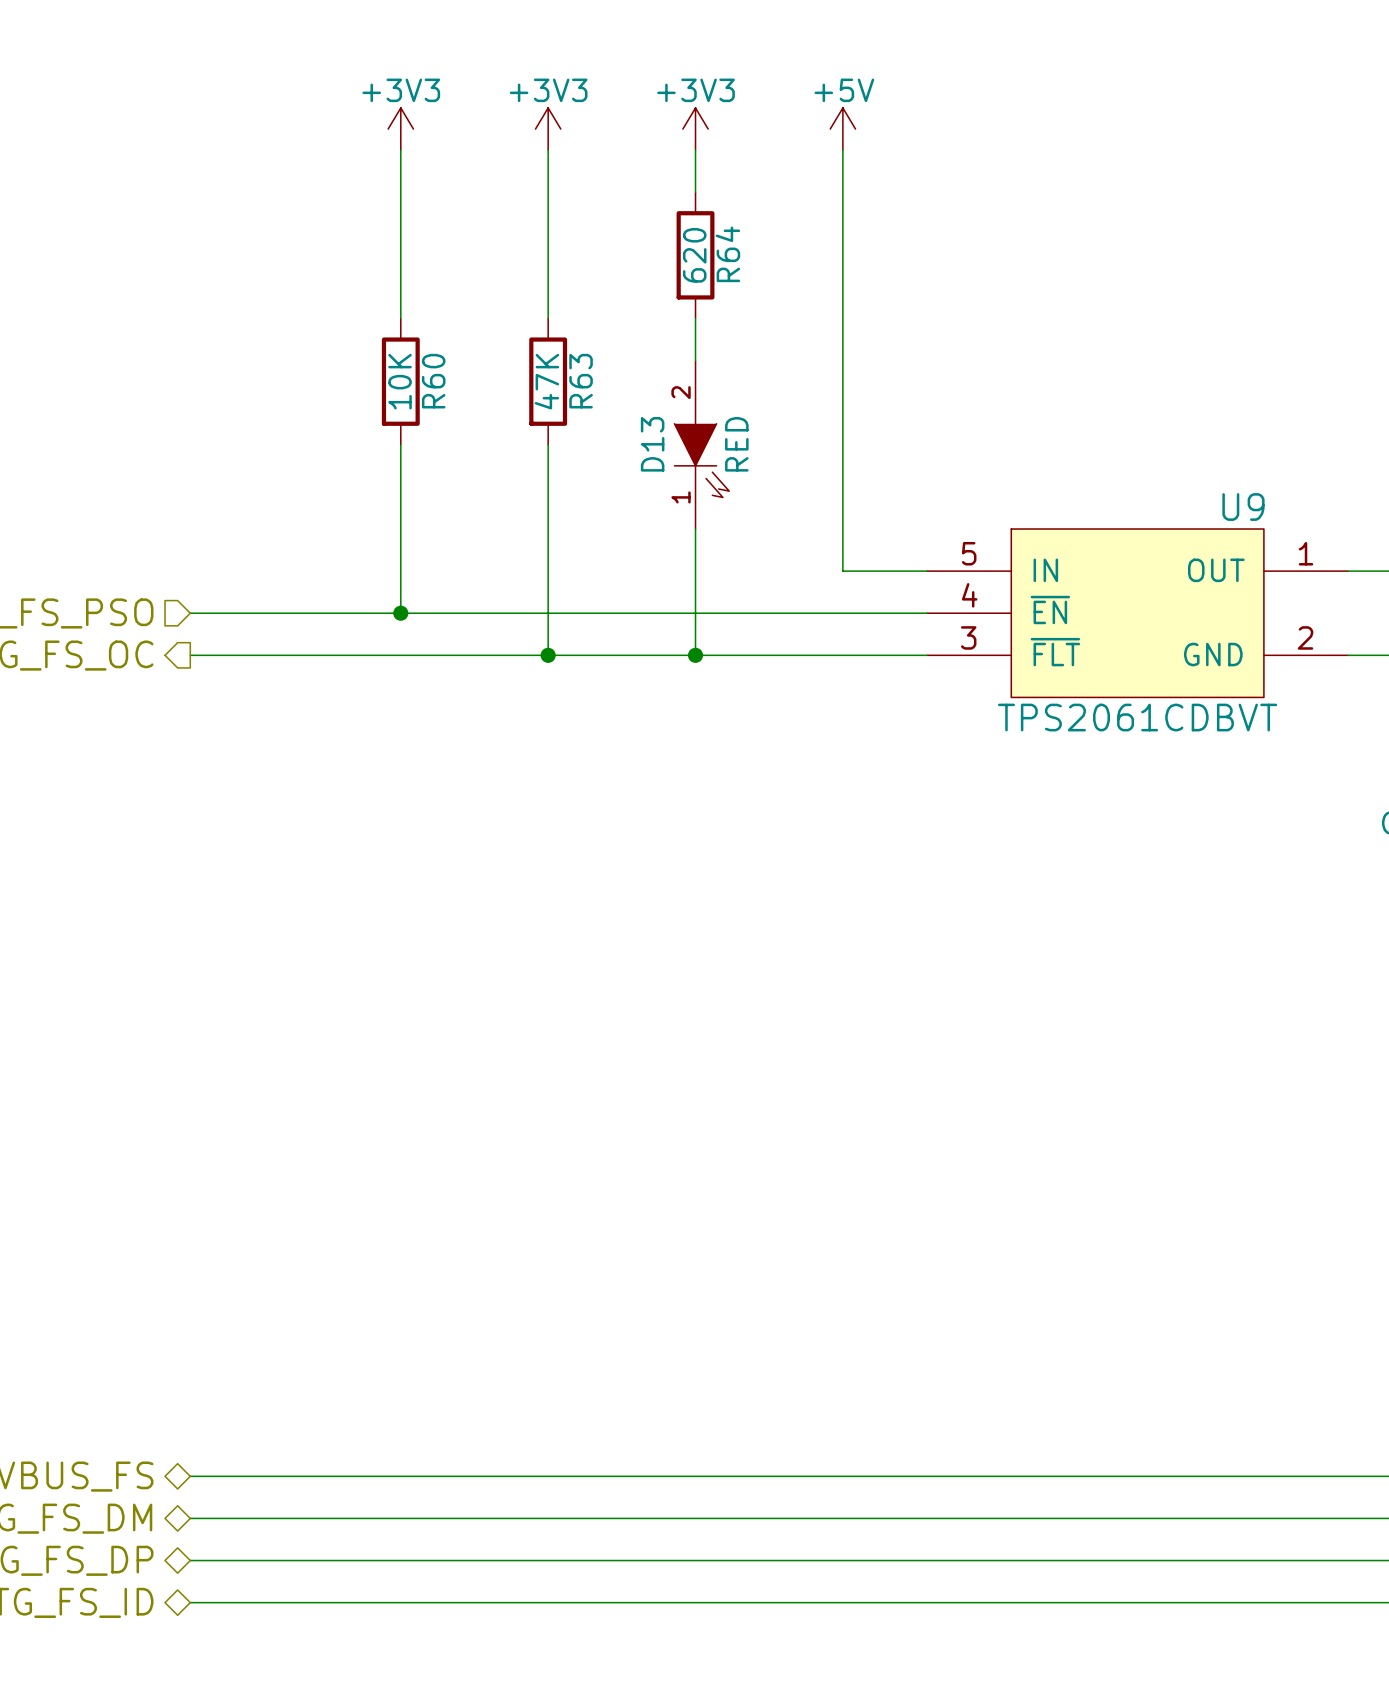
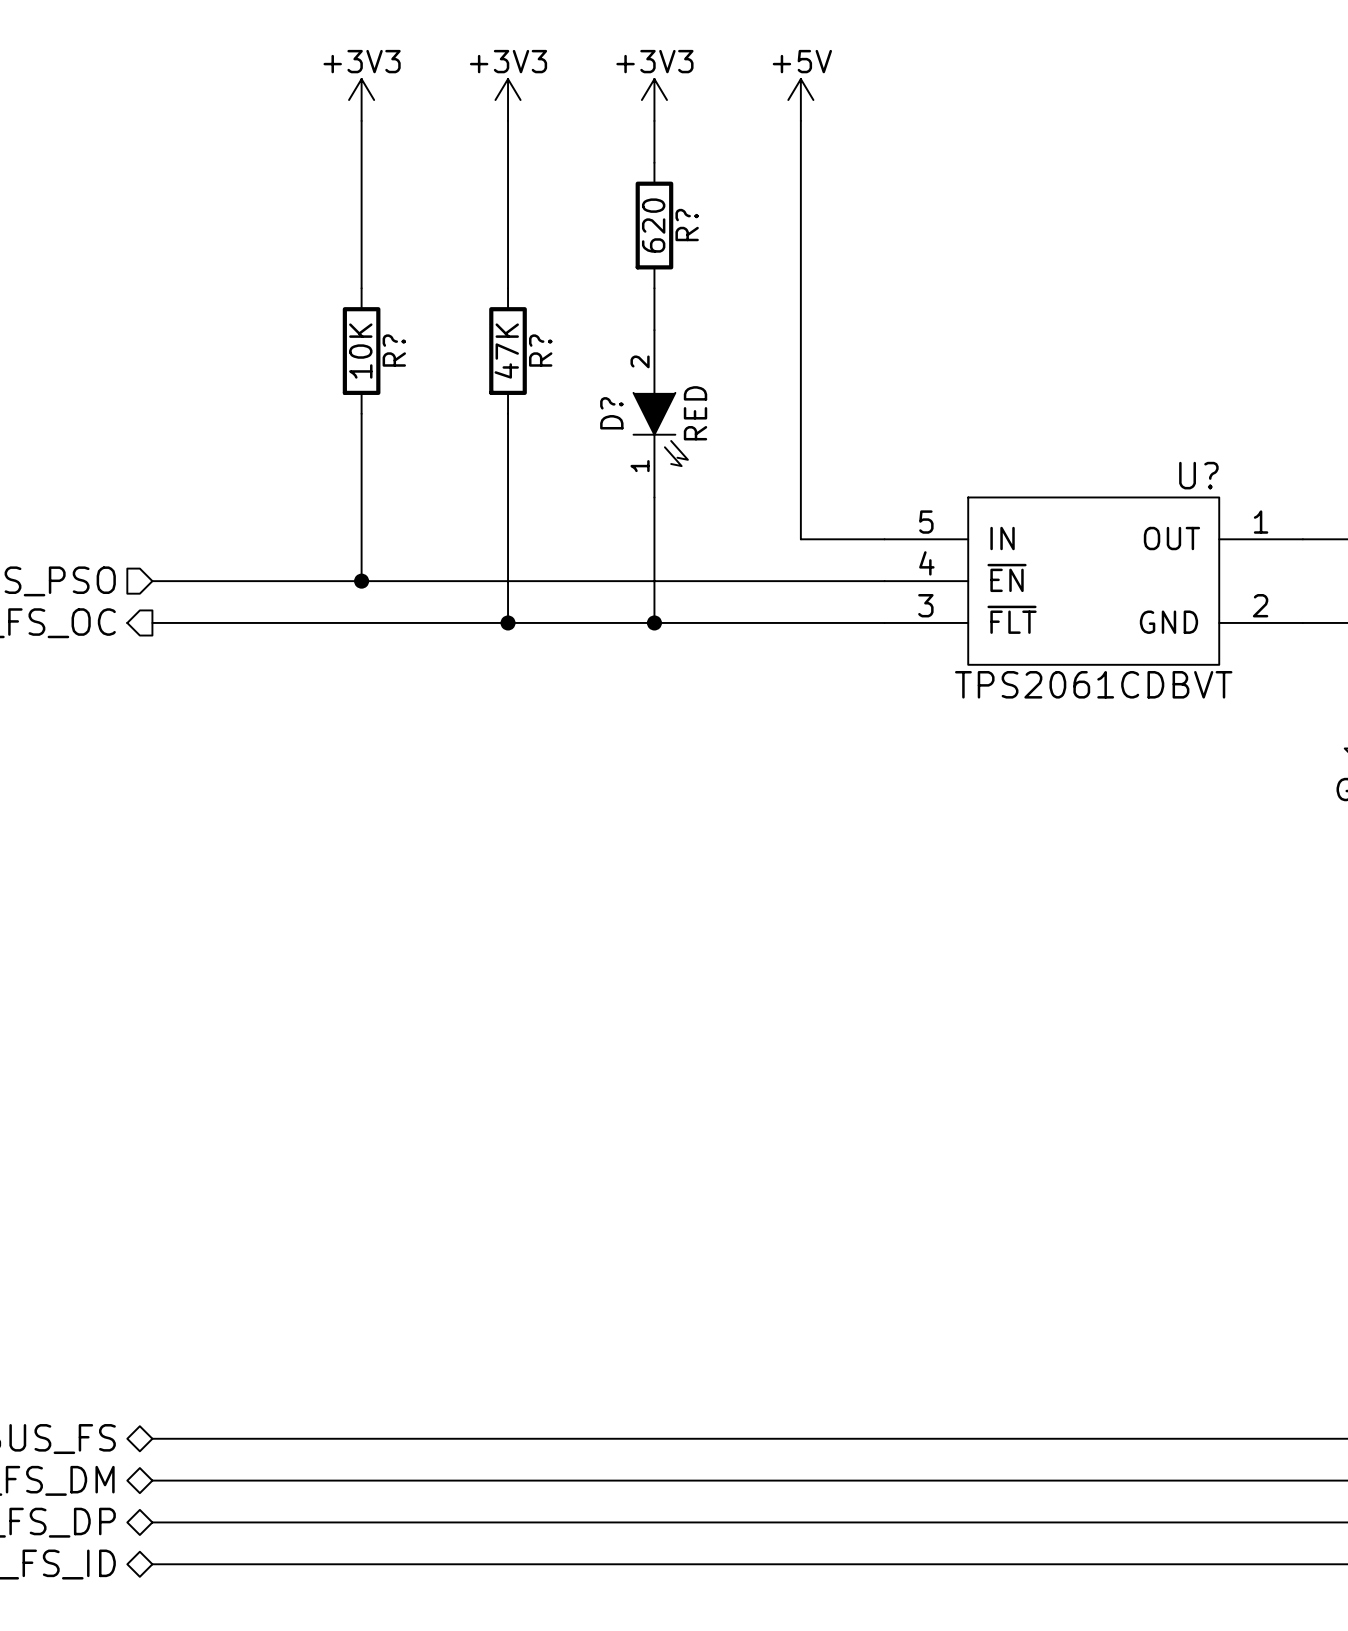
R64 name: R64 (727, 254) -> R? (687, 225)
R60 name: R60 (433, 381) -> R? (394, 350)
R63 name: R63 (581, 381) -> R? (540, 350)
D13 name: D13 (652, 444) -> D? (611, 413)
U9 name: U9 (1243, 507) -> U? (1198, 475)

